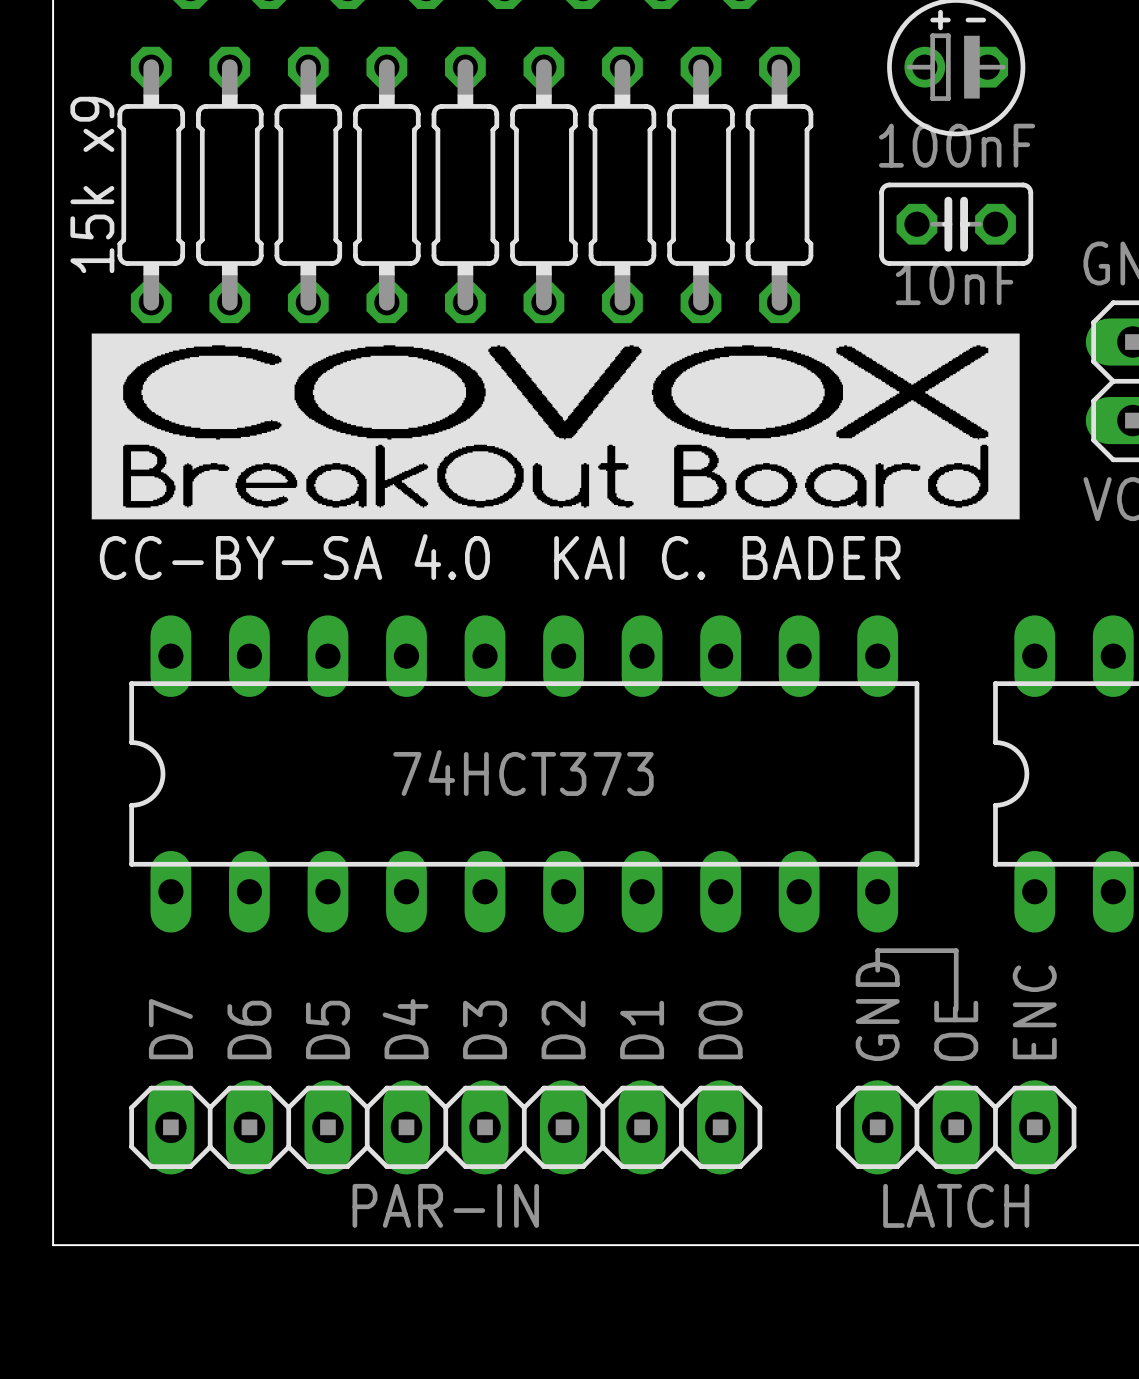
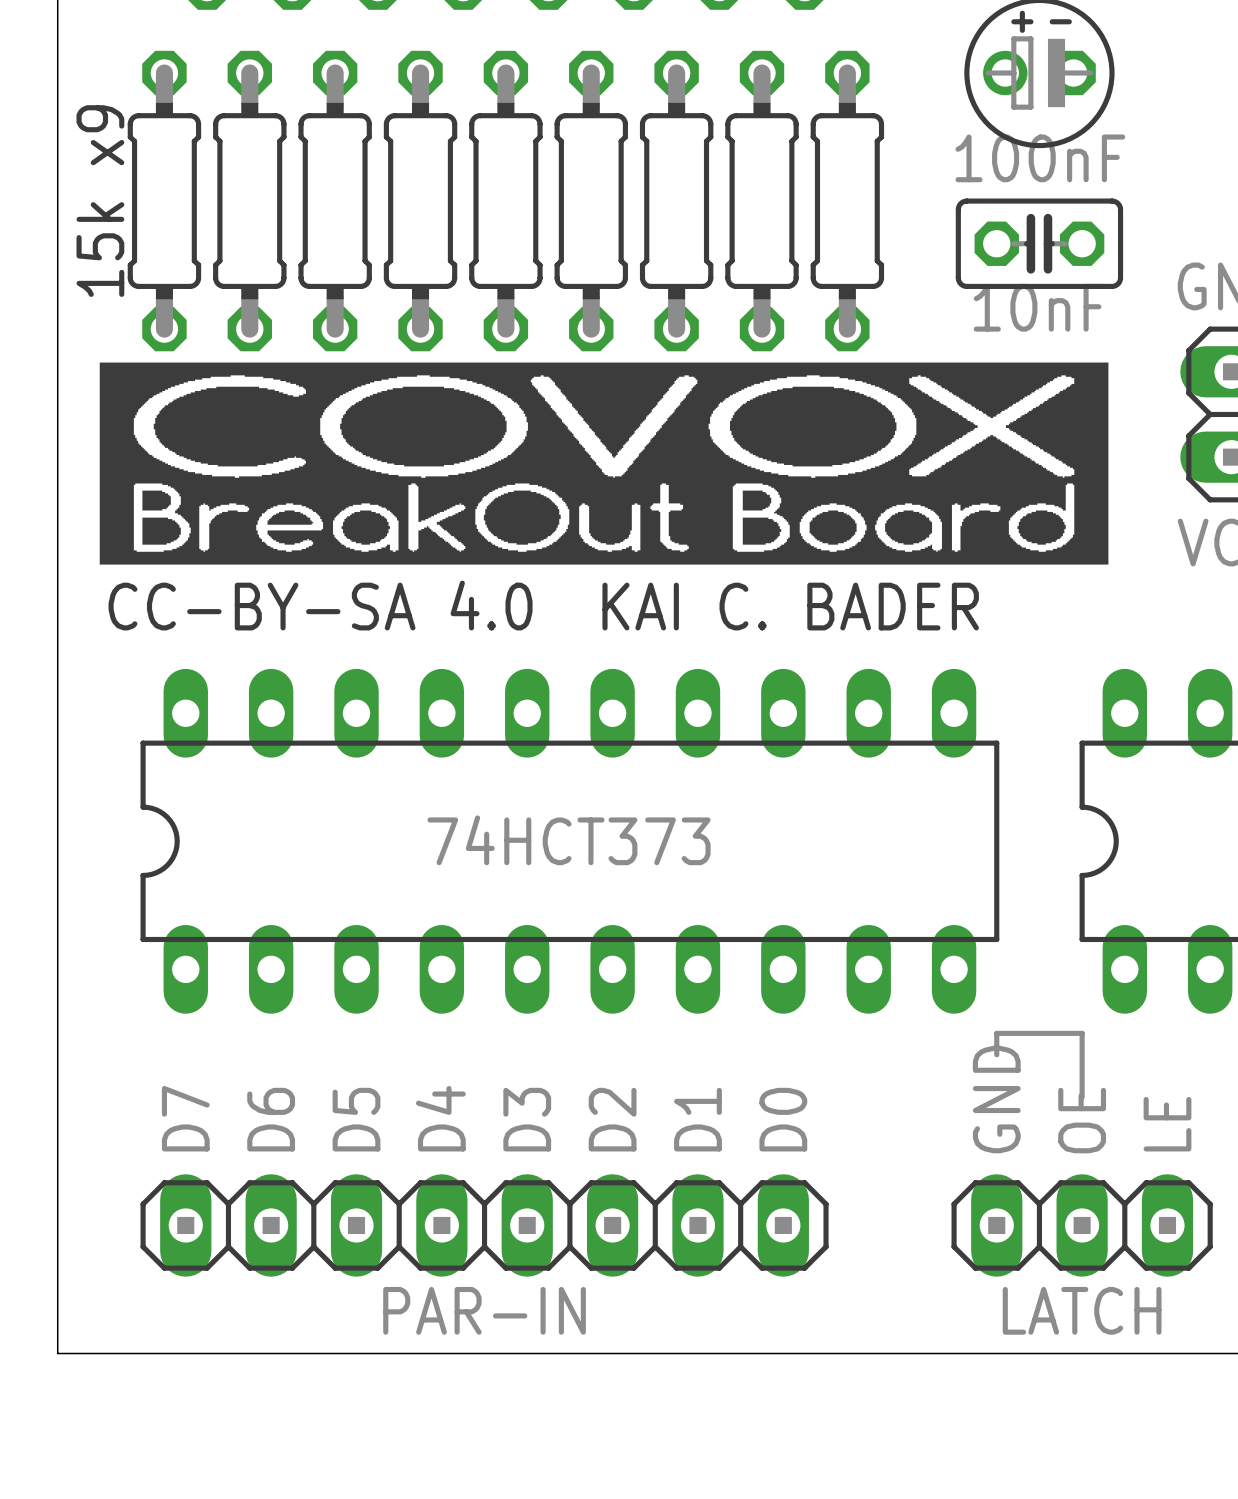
line: (916, 950) (877, 950) (877, 970) -> (996, 1033) (996, 1054)
line: (956, 950) (956, 1009) -> (1039, 1033) (1082, 1033) (1082, 1097)
text position: GND (877, 1011) -> GND (996, 1099)
text: ENC (1034, 1012) -> none
text position: OE (956, 1030) -> OE (1082, 1120)
text: none -> LE (1167, 1124)
part position: (956, 1127) -> (1082, 1225)

